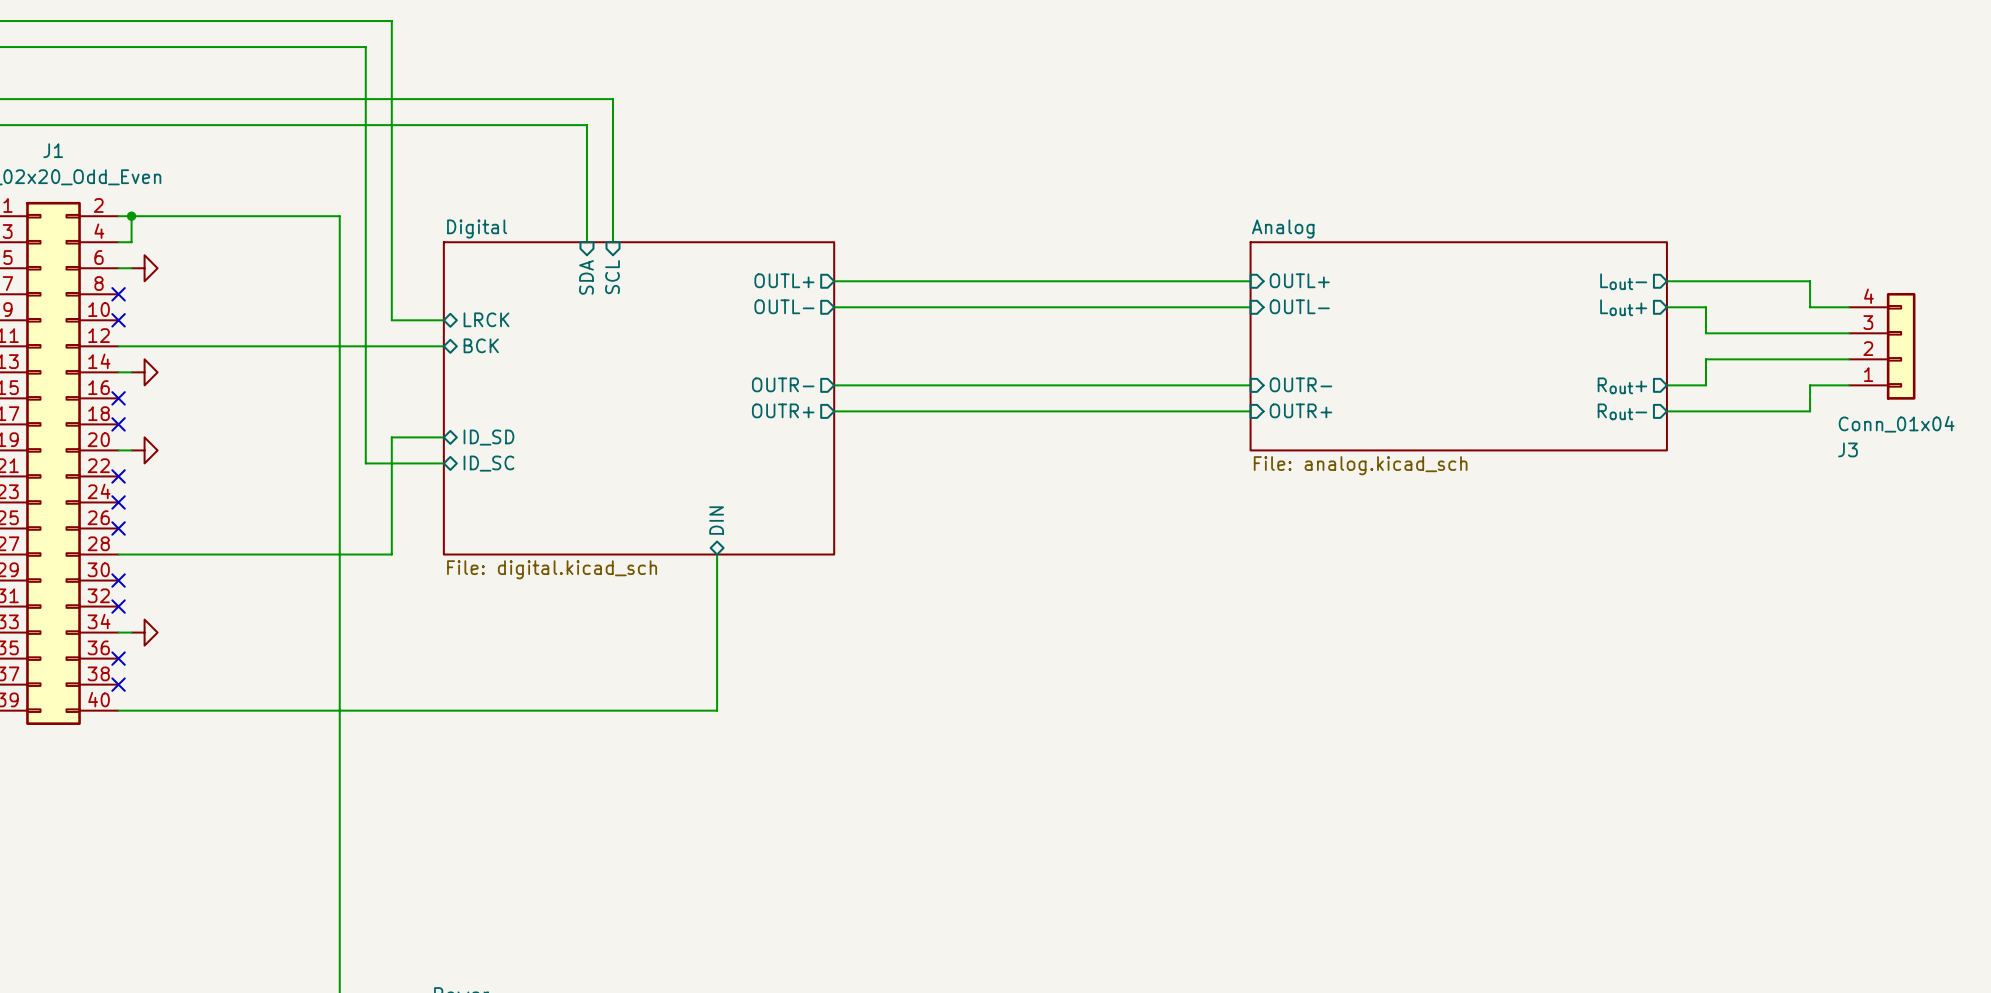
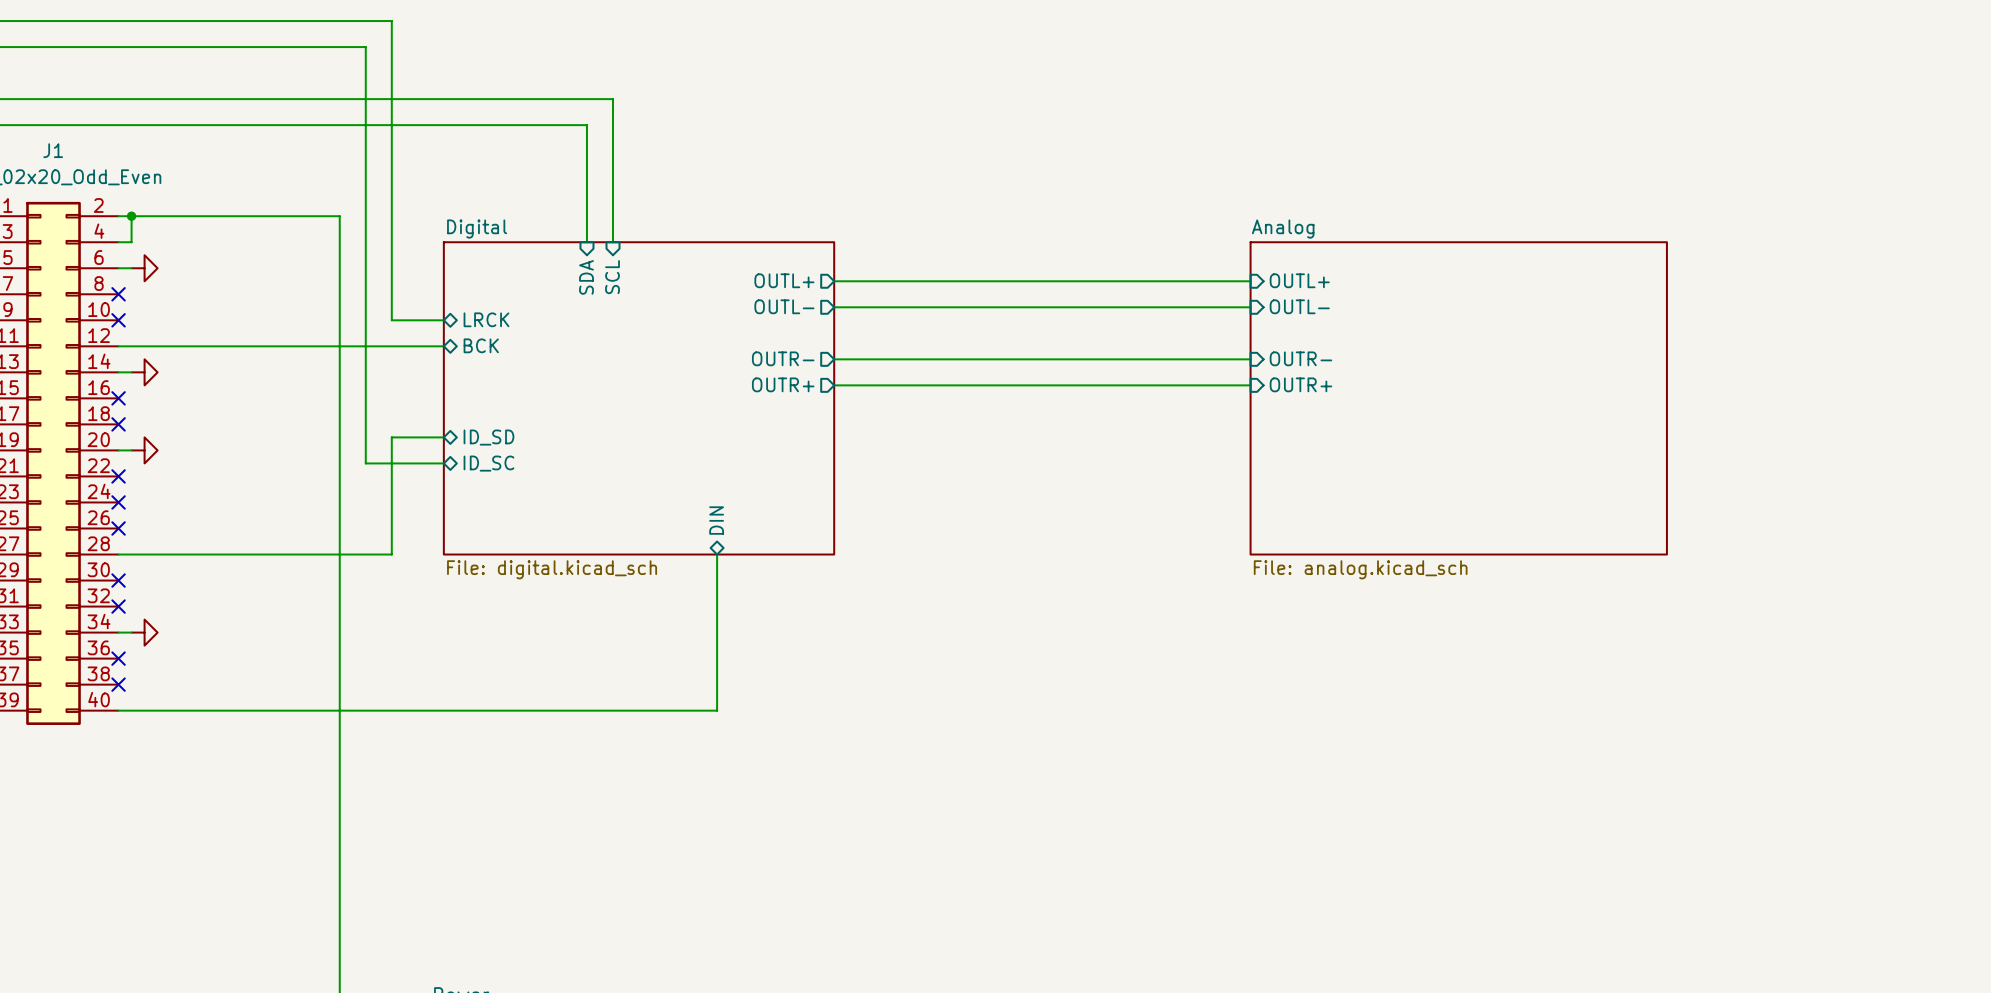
sheet pin: Lout- (1623, 281) -> none
wire: (1666, 281) (1810, 281) (1810, 307) (1849, 307) -> none
sheet pin: Lout+ (1623, 307) -> none
wire: (1666, 307) (1705, 307) (1705, 333) (1849, 333) -> none
sheet Analog: File: analog.kicad_sch (1458, 346) -> none
J3: Conn_01x04 (1882, 346) -> none
sheet pin: none -> OUTR- (783, 358)
sheet pin: none -> OUTR- (1300, 358)
wire: (1849, 359) (1705, 359) (1705, 385) (1666, 385) -> none
sheet pin: OUTR- (783, 384) -> OUTR+ (783, 384)
sheet pin: OUTR- (1300, 384) -> OUTR+ (1300, 384)
sheet pin: Rout+ (1622, 385) -> none
wire: (1849, 385) (1810, 385) (1810, 411) (1666, 411) -> none
sheet Analog: none -> File: analog.kicad_sch (1458, 398)
sheet pin: OUTR+ (783, 410) -> none
sheet pin: OUTR+ (1300, 410) -> none
wire: (834, 411) (1250, 411) -> (834, 359) (1250, 359)
sheet pin: Rout- (1622, 411) -> none

